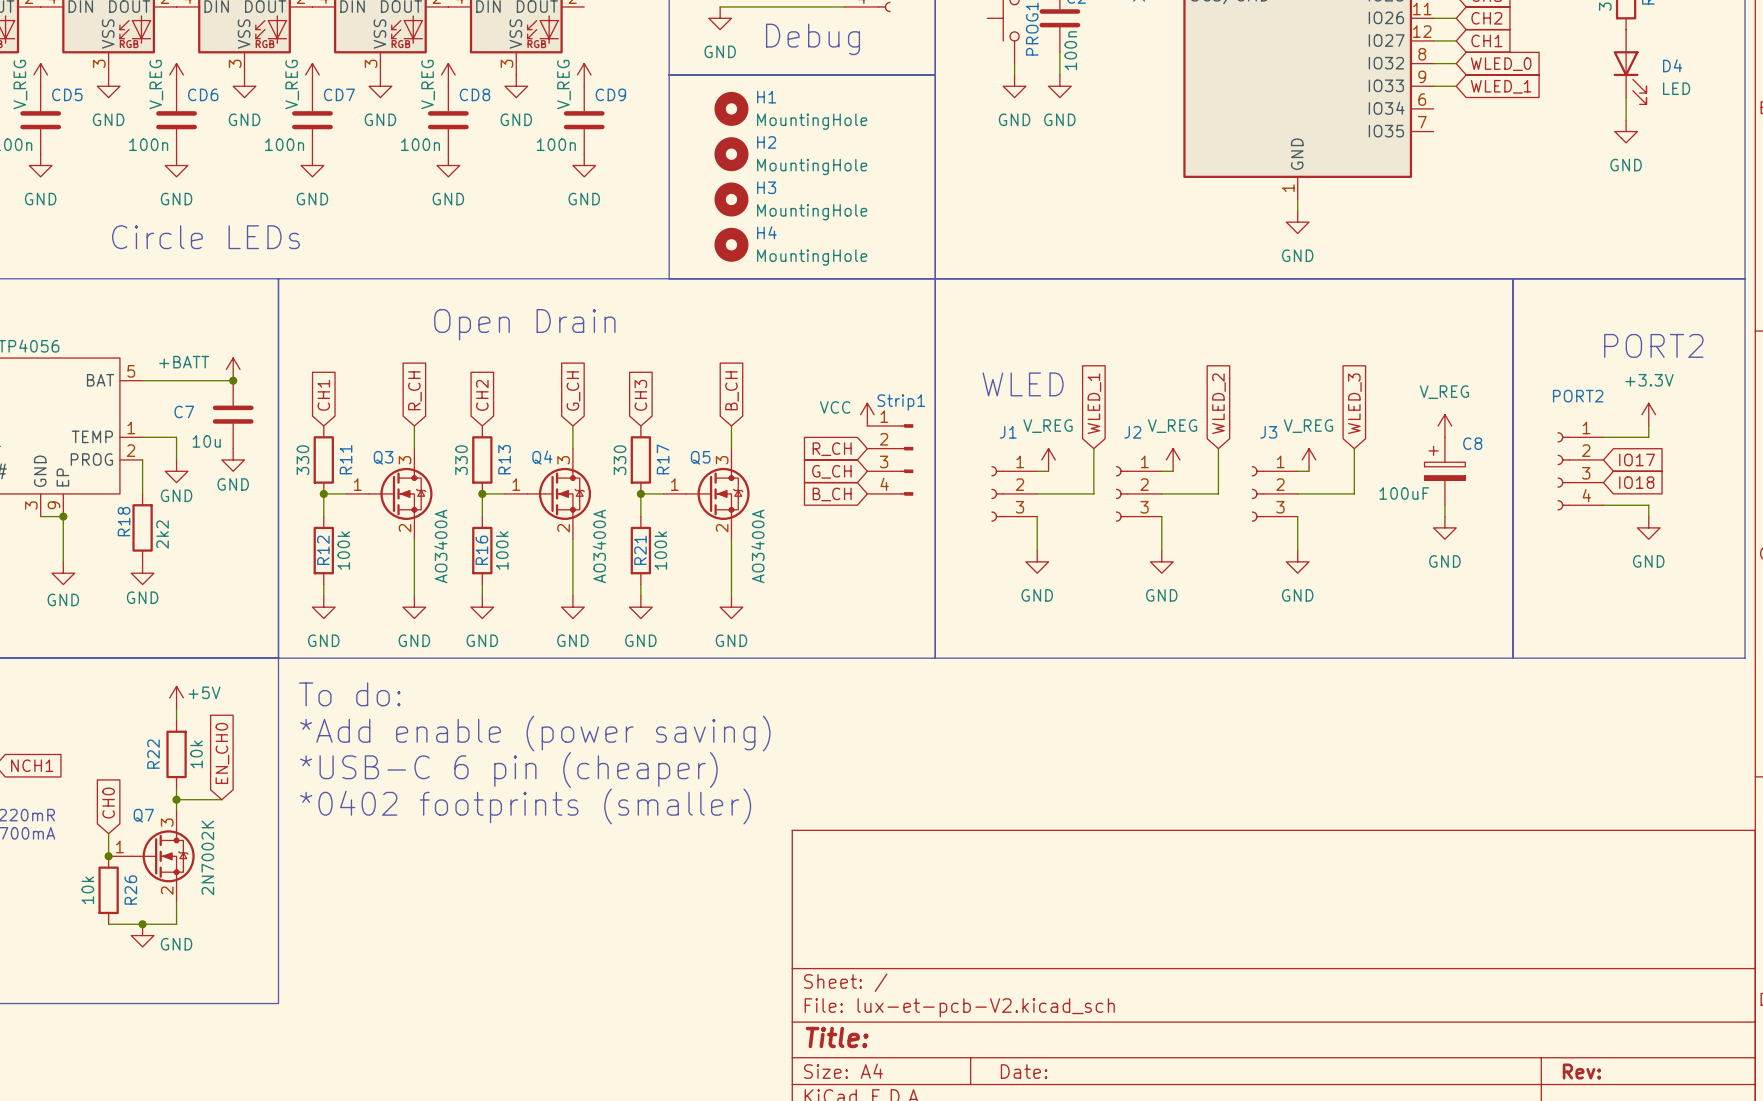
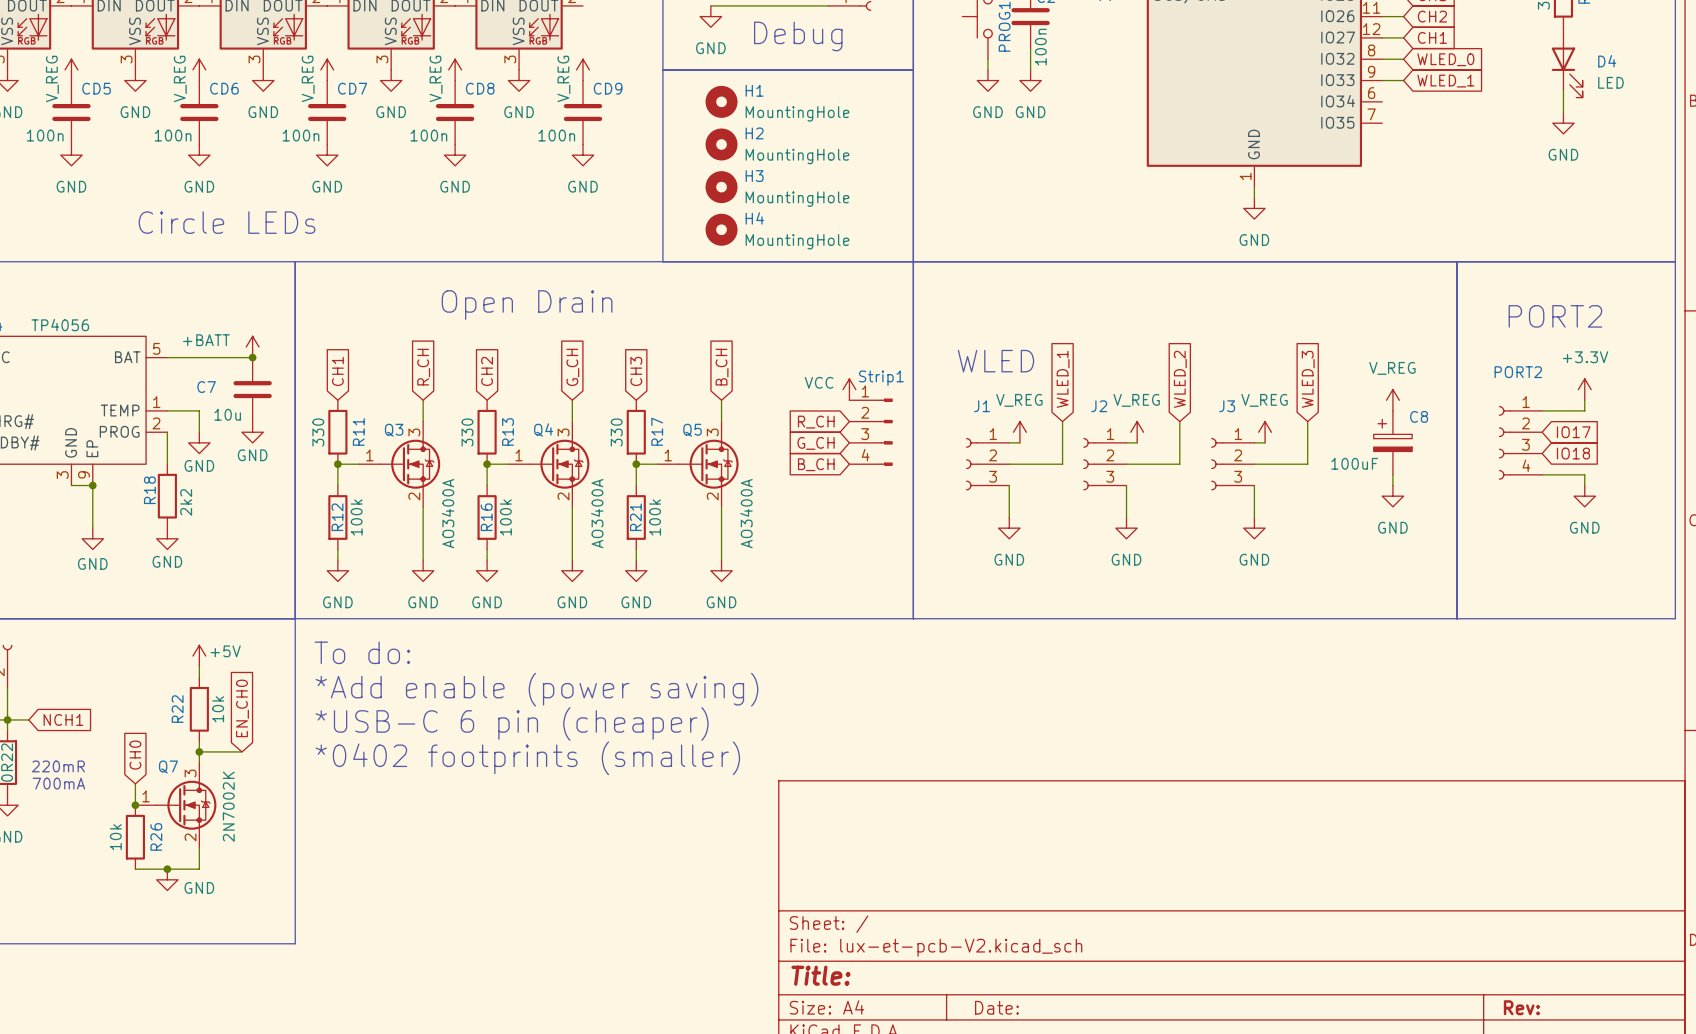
text position: PORT2 (1653, 345) -> PORT2 (1555, 316)

